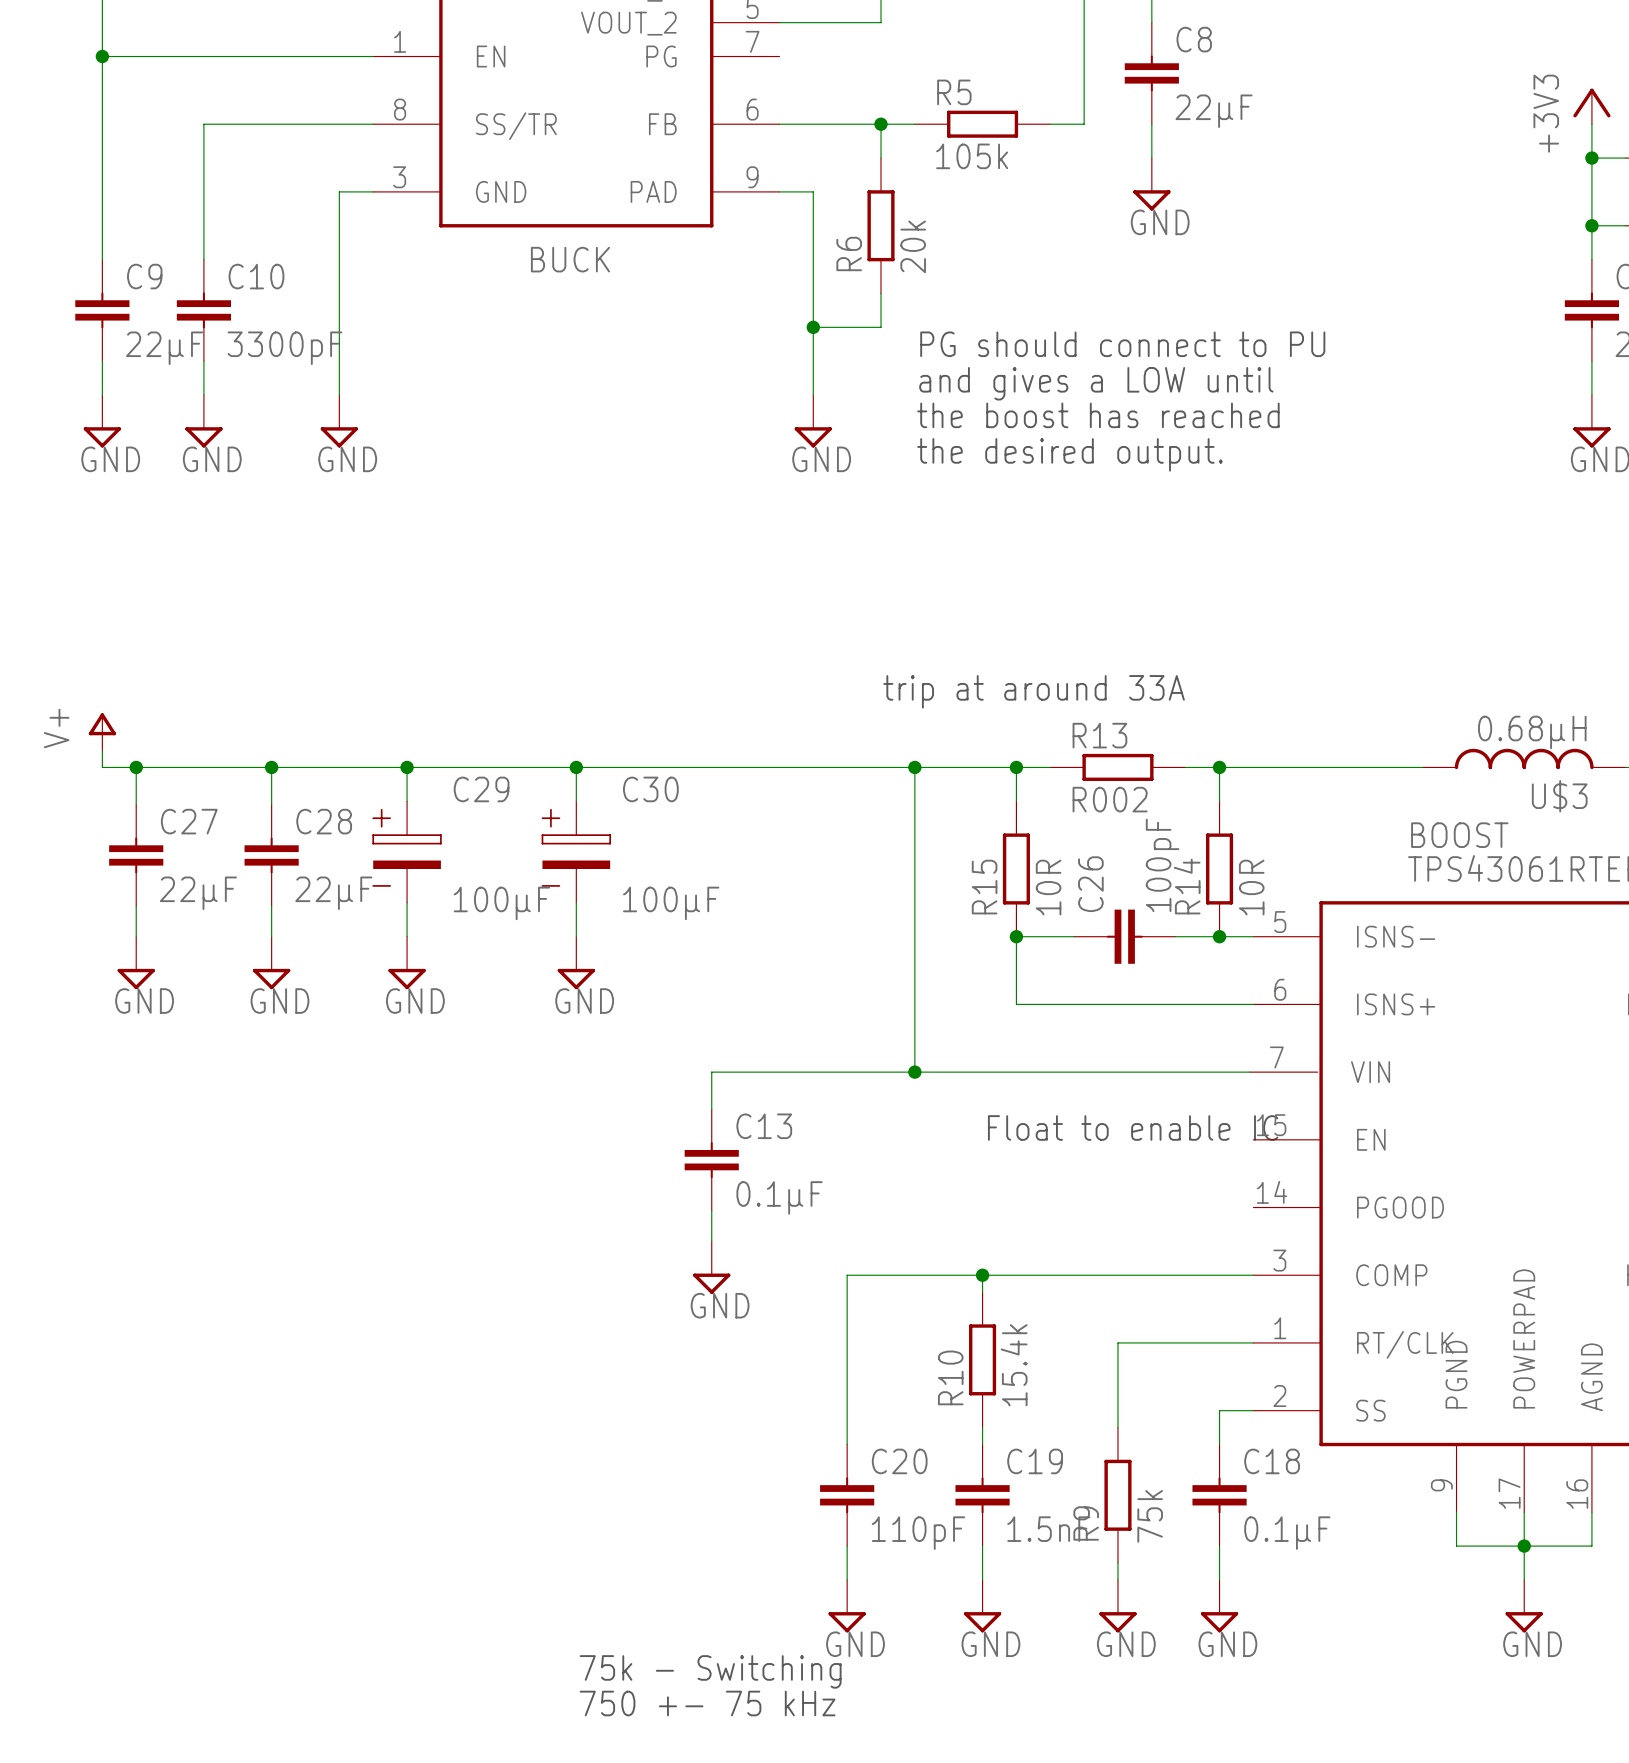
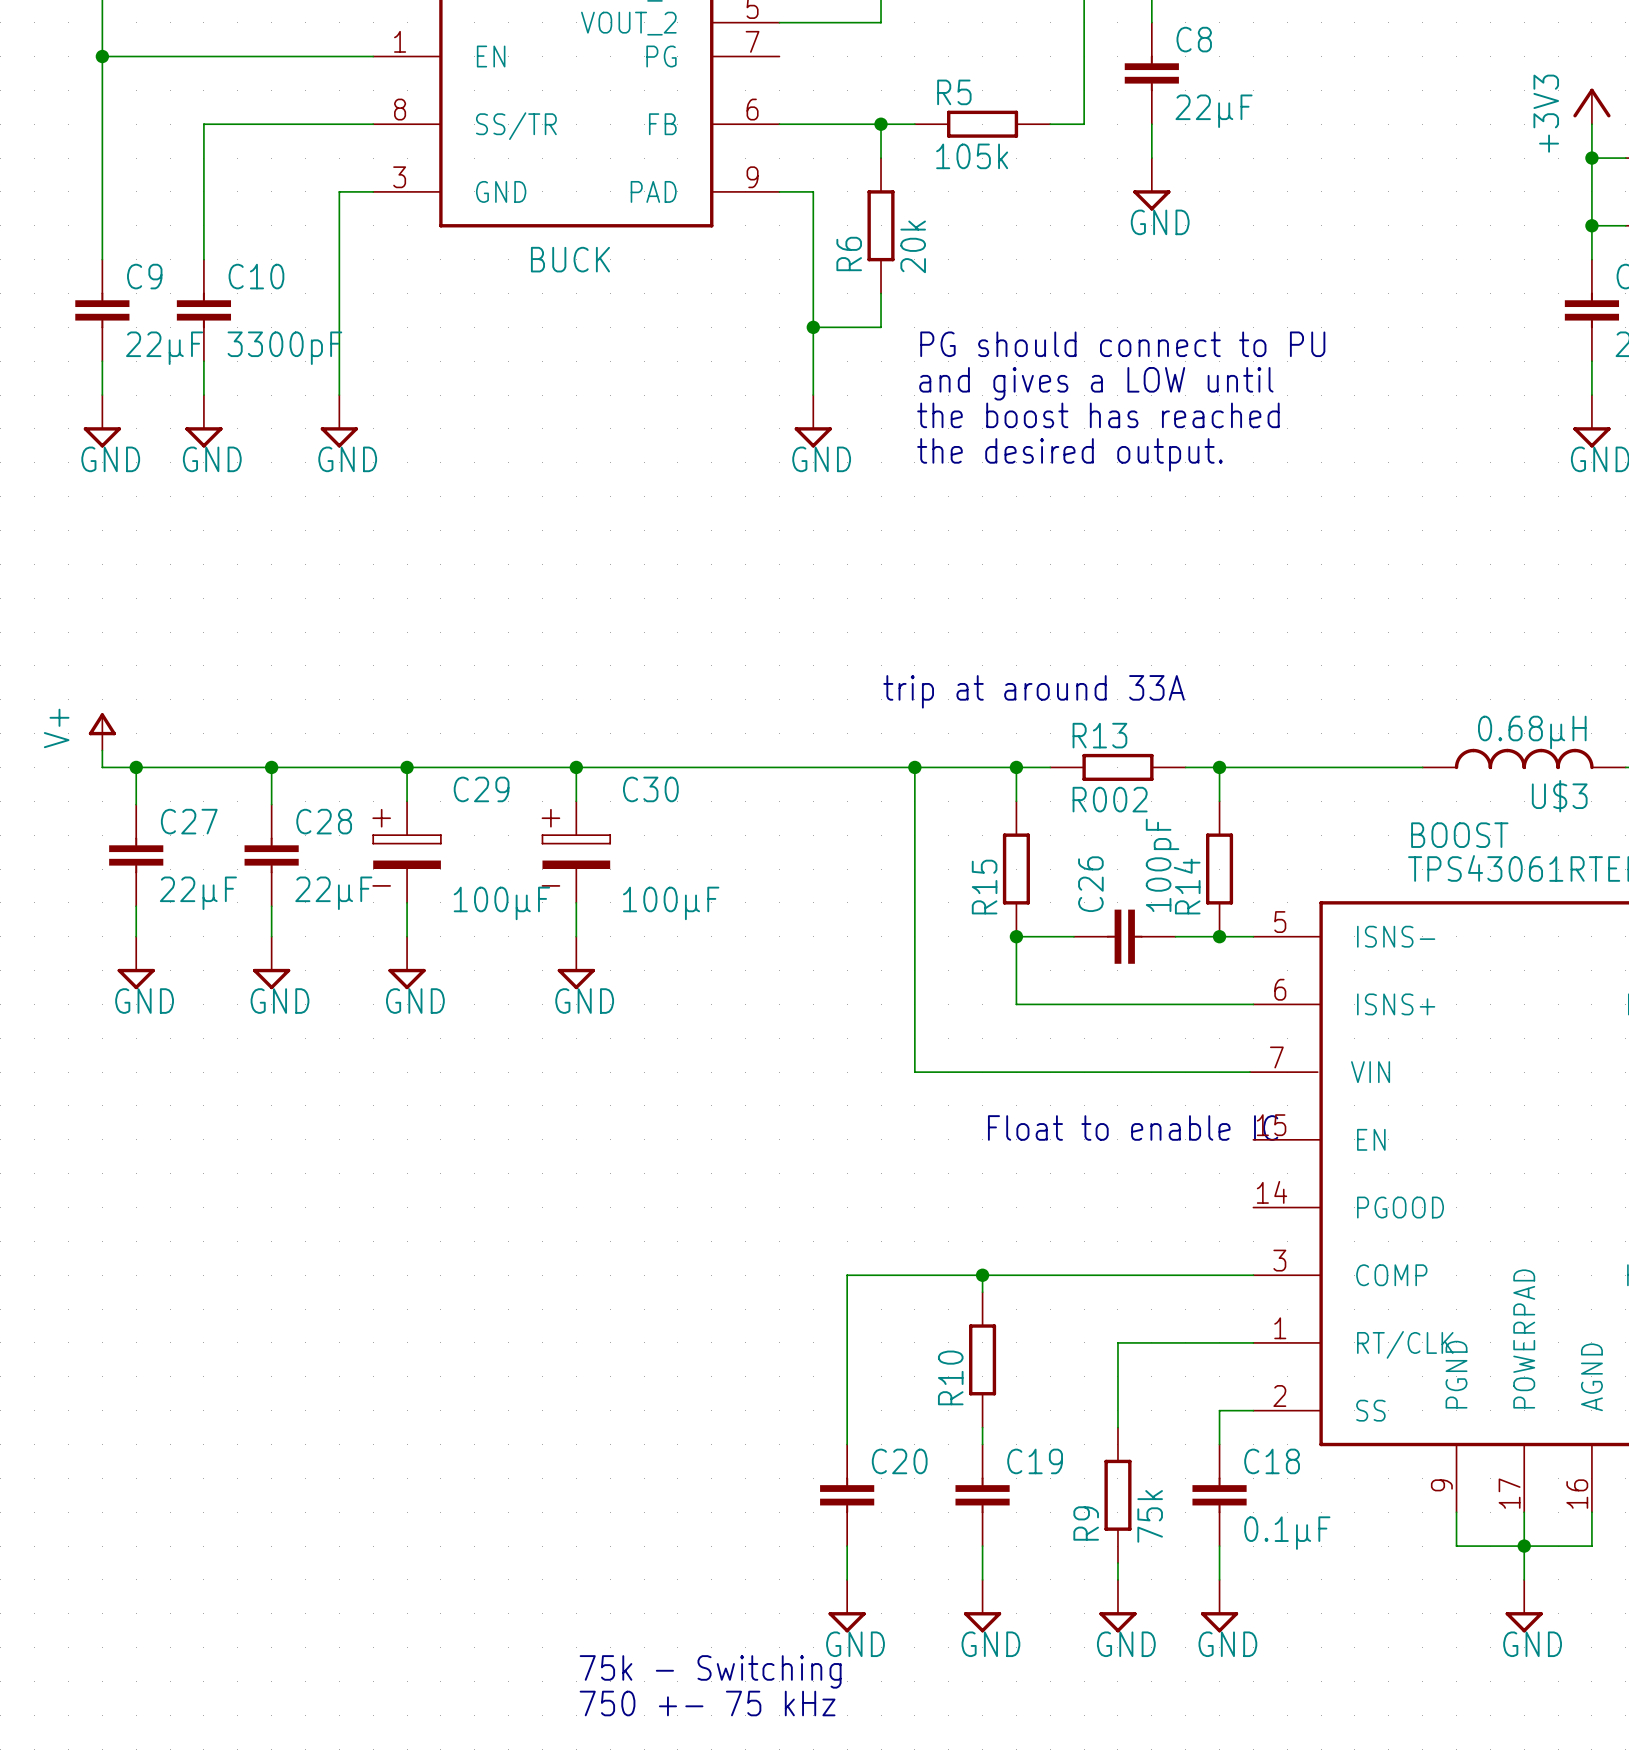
R15 value: 10R (1048, 887) -> none
R14 value: 10R (1251, 887) -> none
wire: (914, 1072) (711, 1072) (711, 1109) -> none
junction: (914, 1072) -> none
C13: 0.1µF (711, 1160) -> none
wire: (711, 1210) (711, 1241) -> none
power symbol: GND (711, 1267) -> none
R10 value: 15.4k (1014, 1365) -> none
C19 value: 1.5nF (1048, 1529) -> none
C20 value: 110pF (918, 1533) -> none

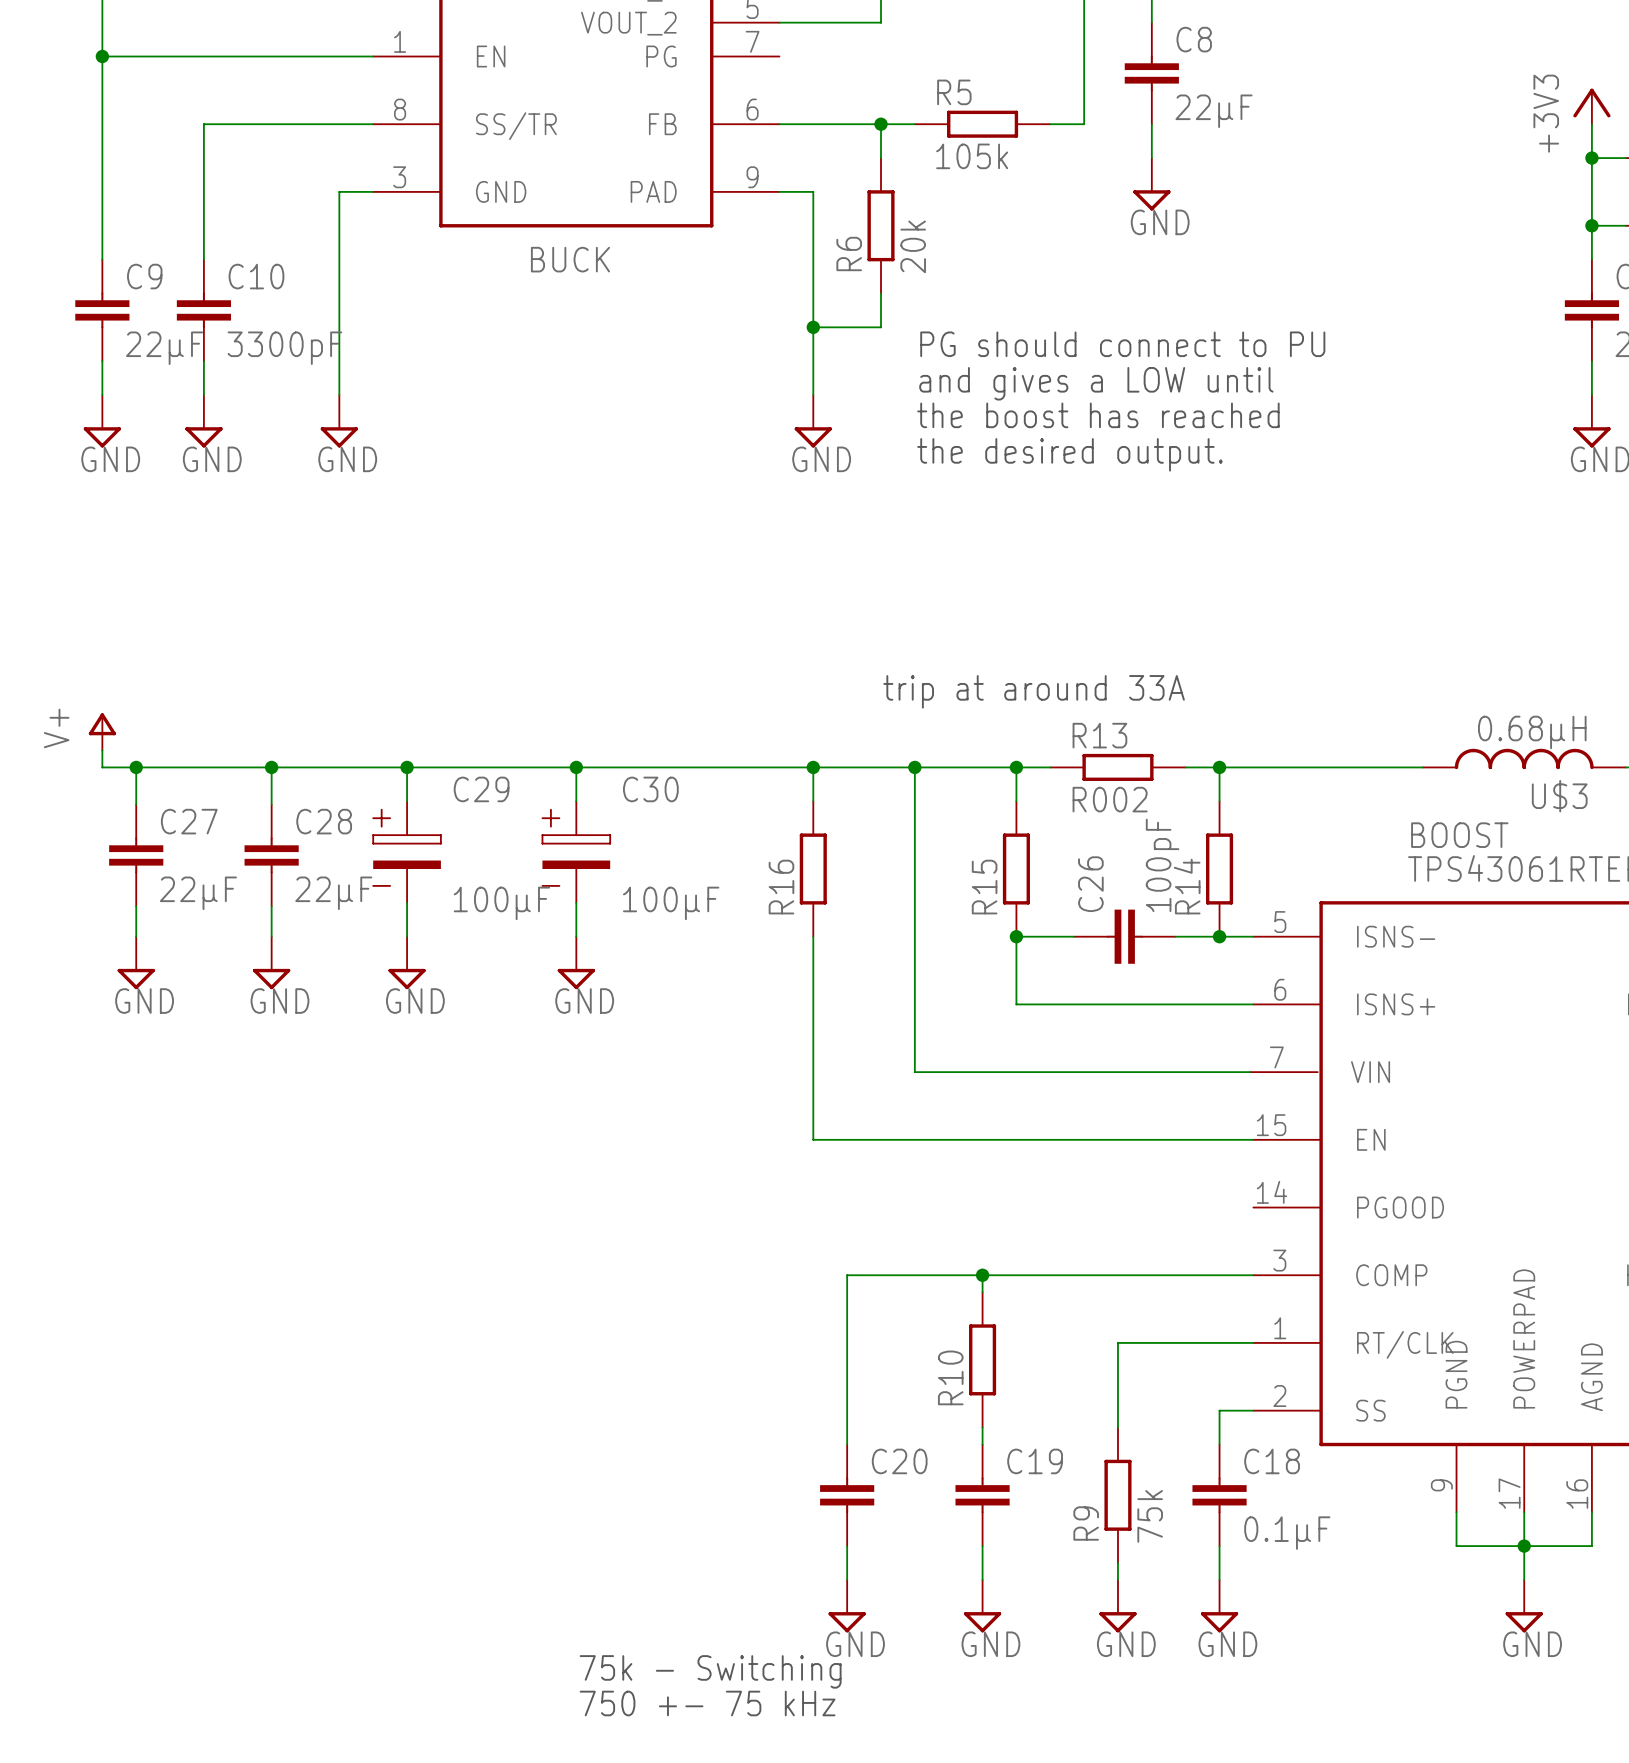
wire: none -> (813, 767) (813, 801)
junction: none -> (813, 767)
R16: none -> (813, 869)
wire: none -> (813, 936) (813, 1139) (1253, 1139)
text: Float to enable IC (1133, 1127) -> none

